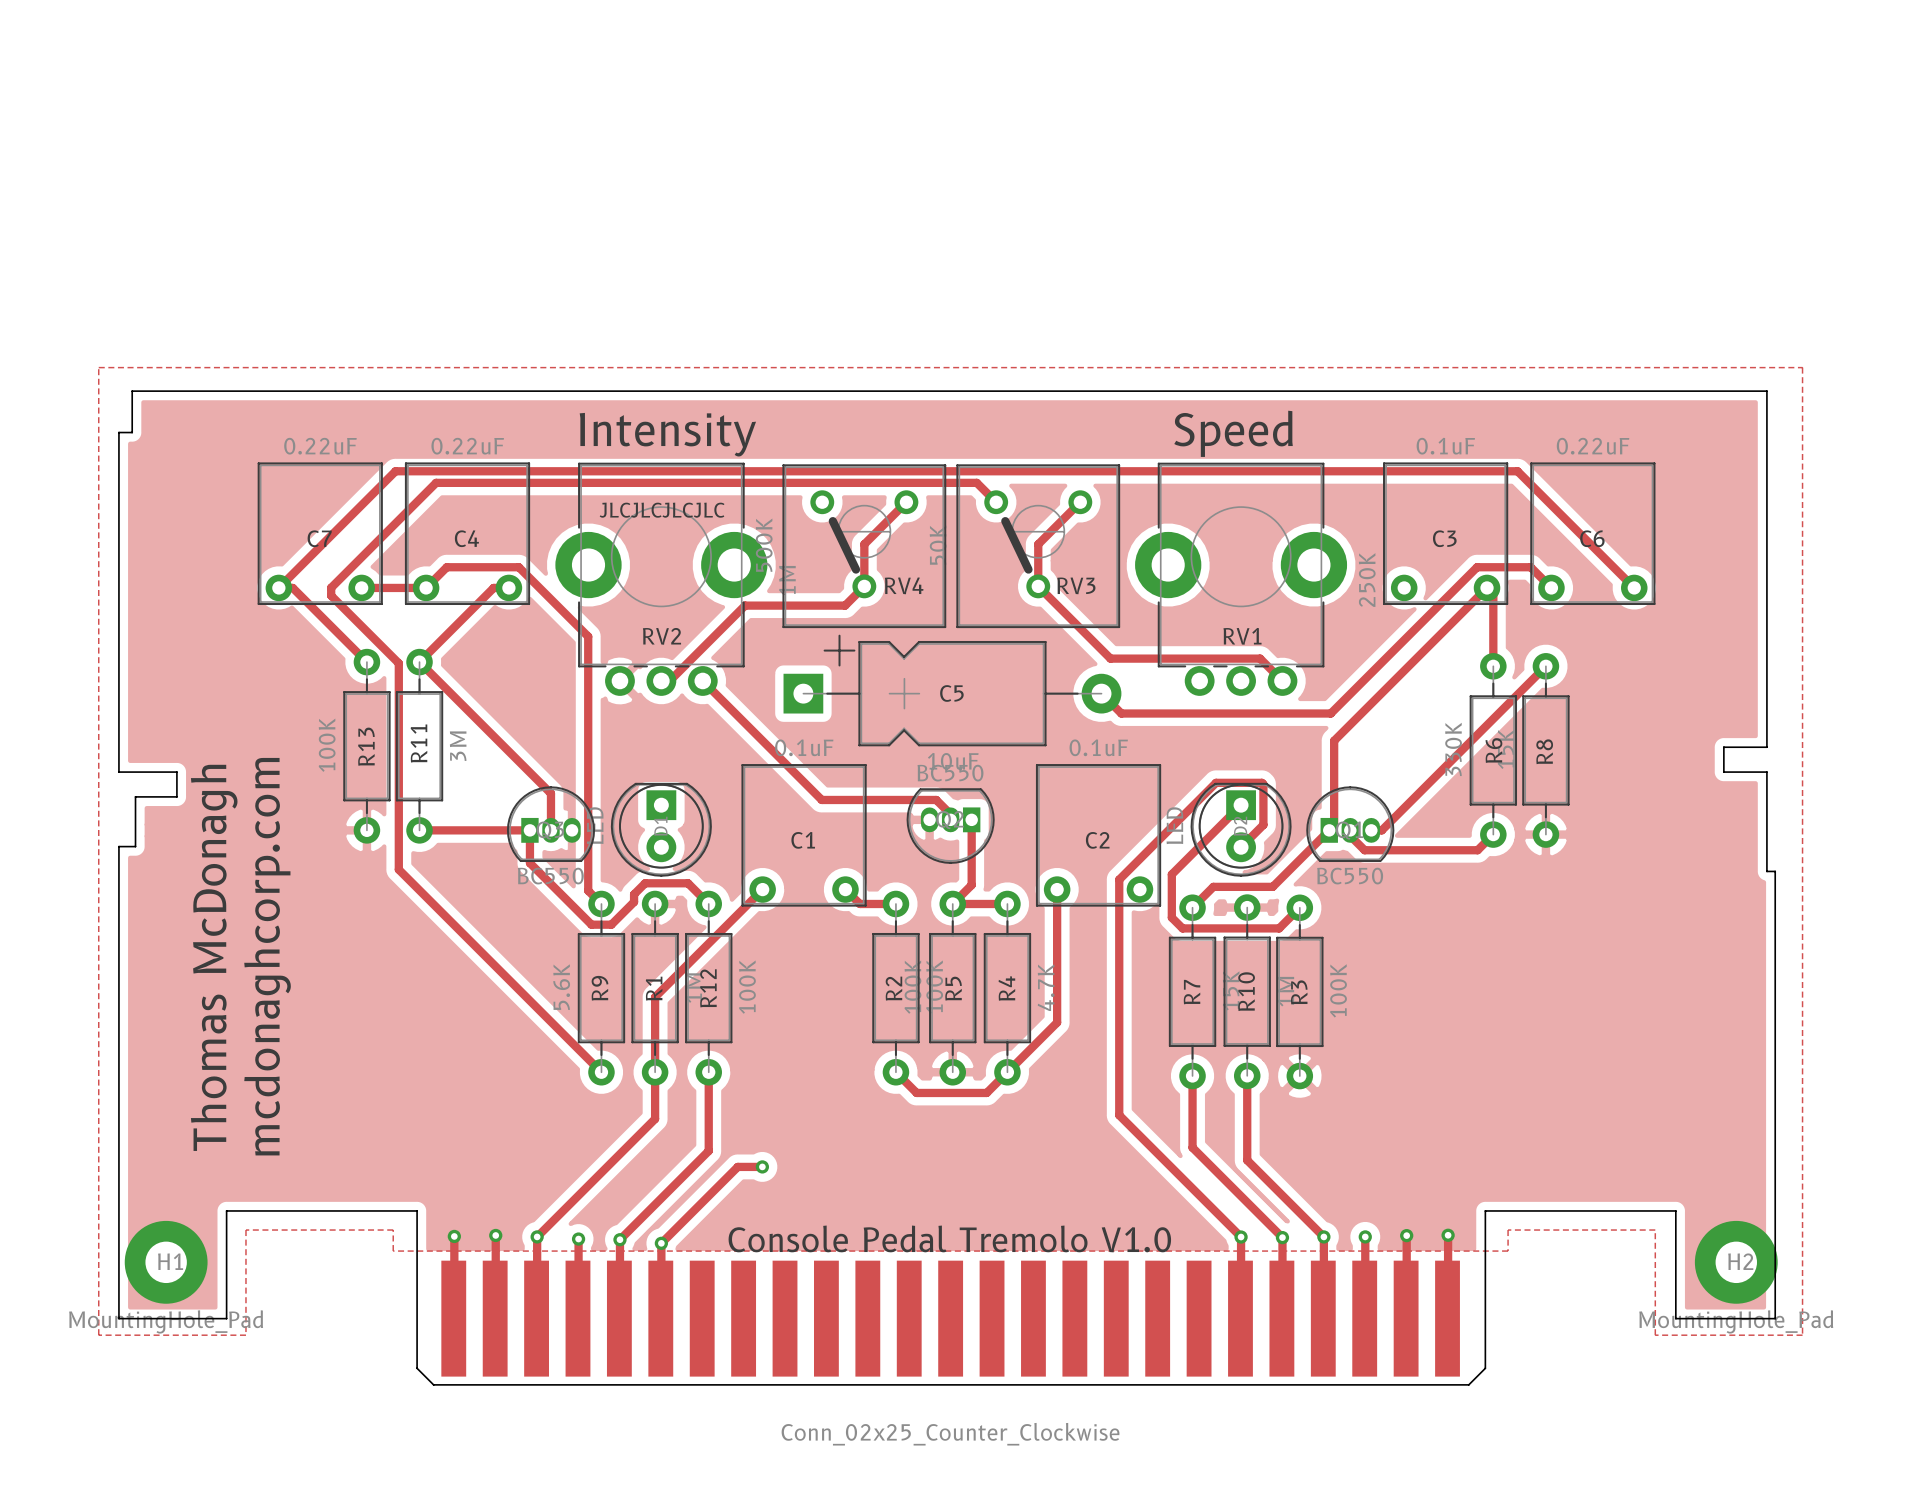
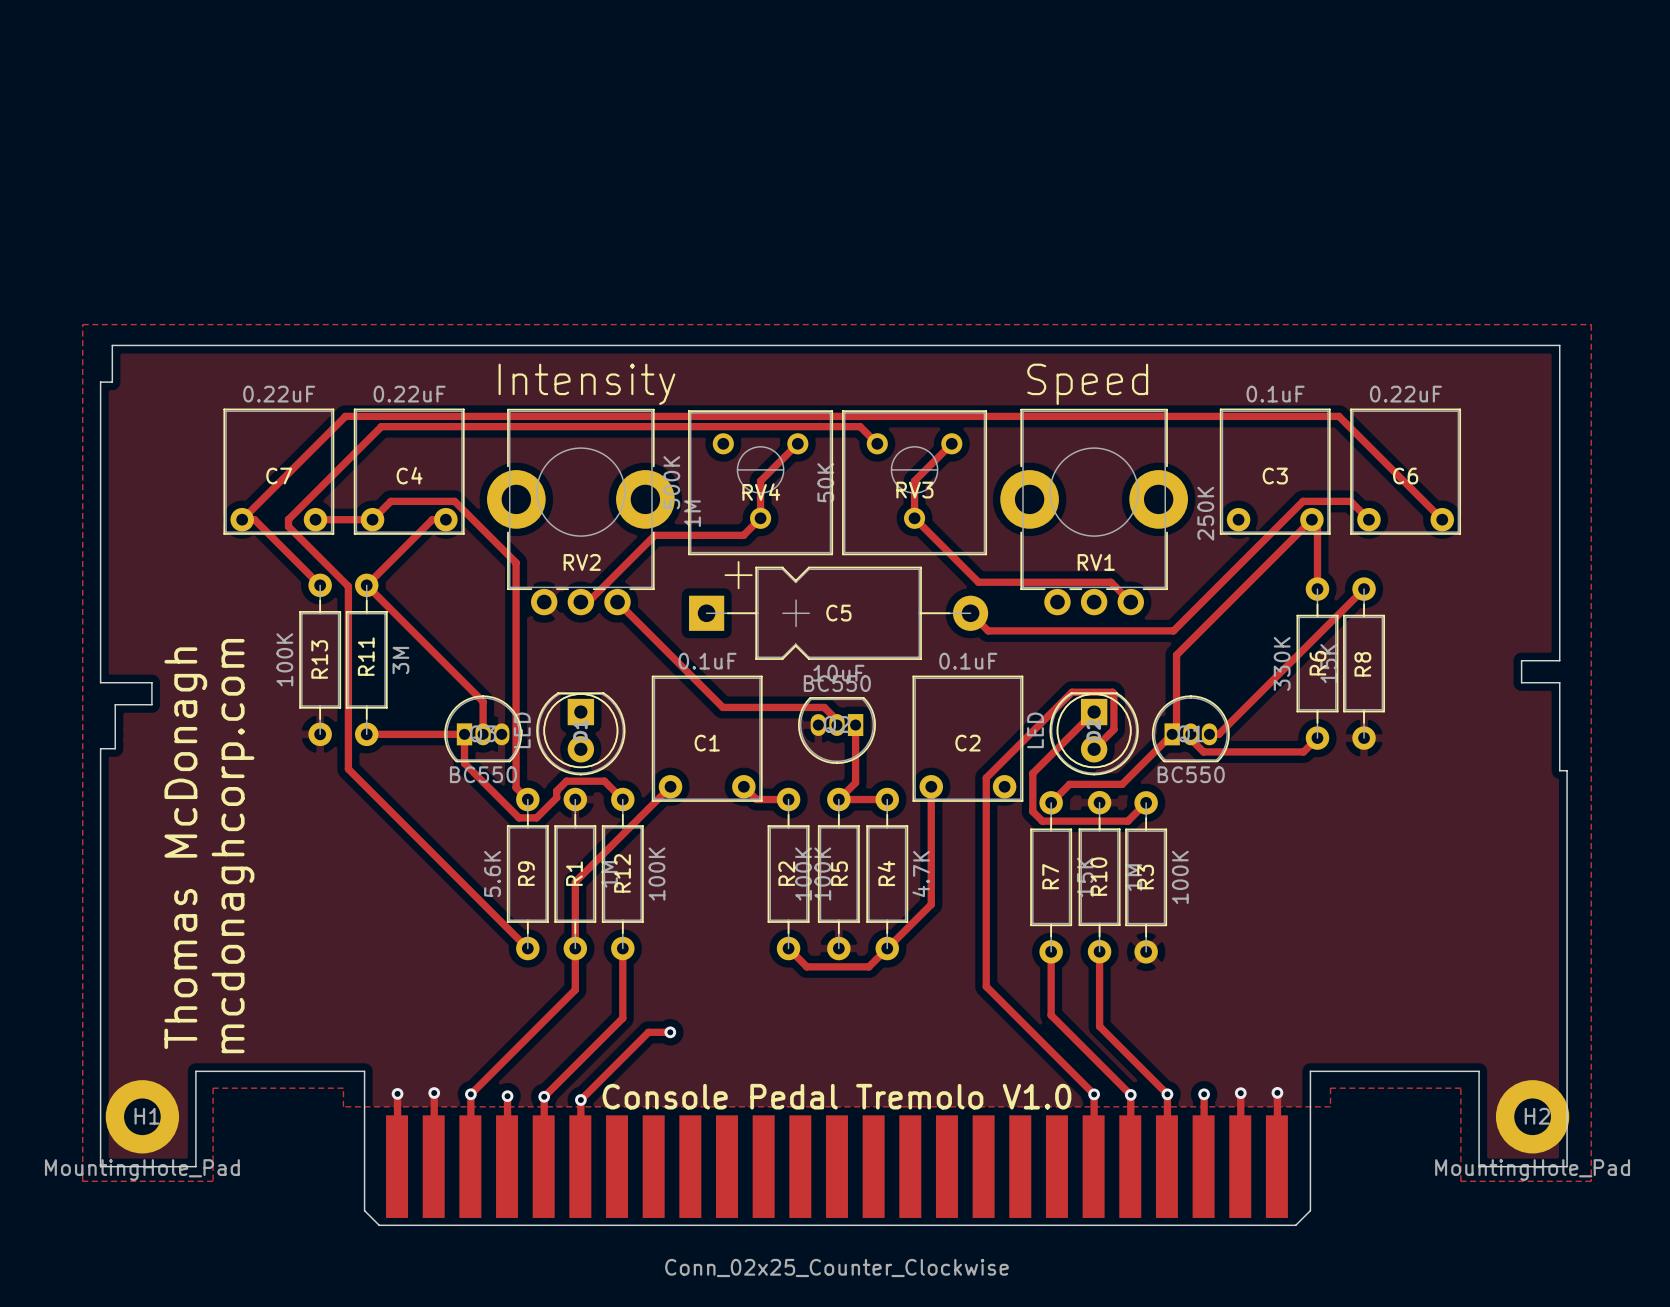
text: JLCJLCJLCJLC (662, 510) -> none
line: (832, 521) (855, 569) -> none
line: (1005, 521) (1028, 569) -> none
RV4 name position: RV4 (904, 585) -> RV4 (761, 492)
RV3 name position: RV3 (1076, 585) -> RV3 (914, 490)

